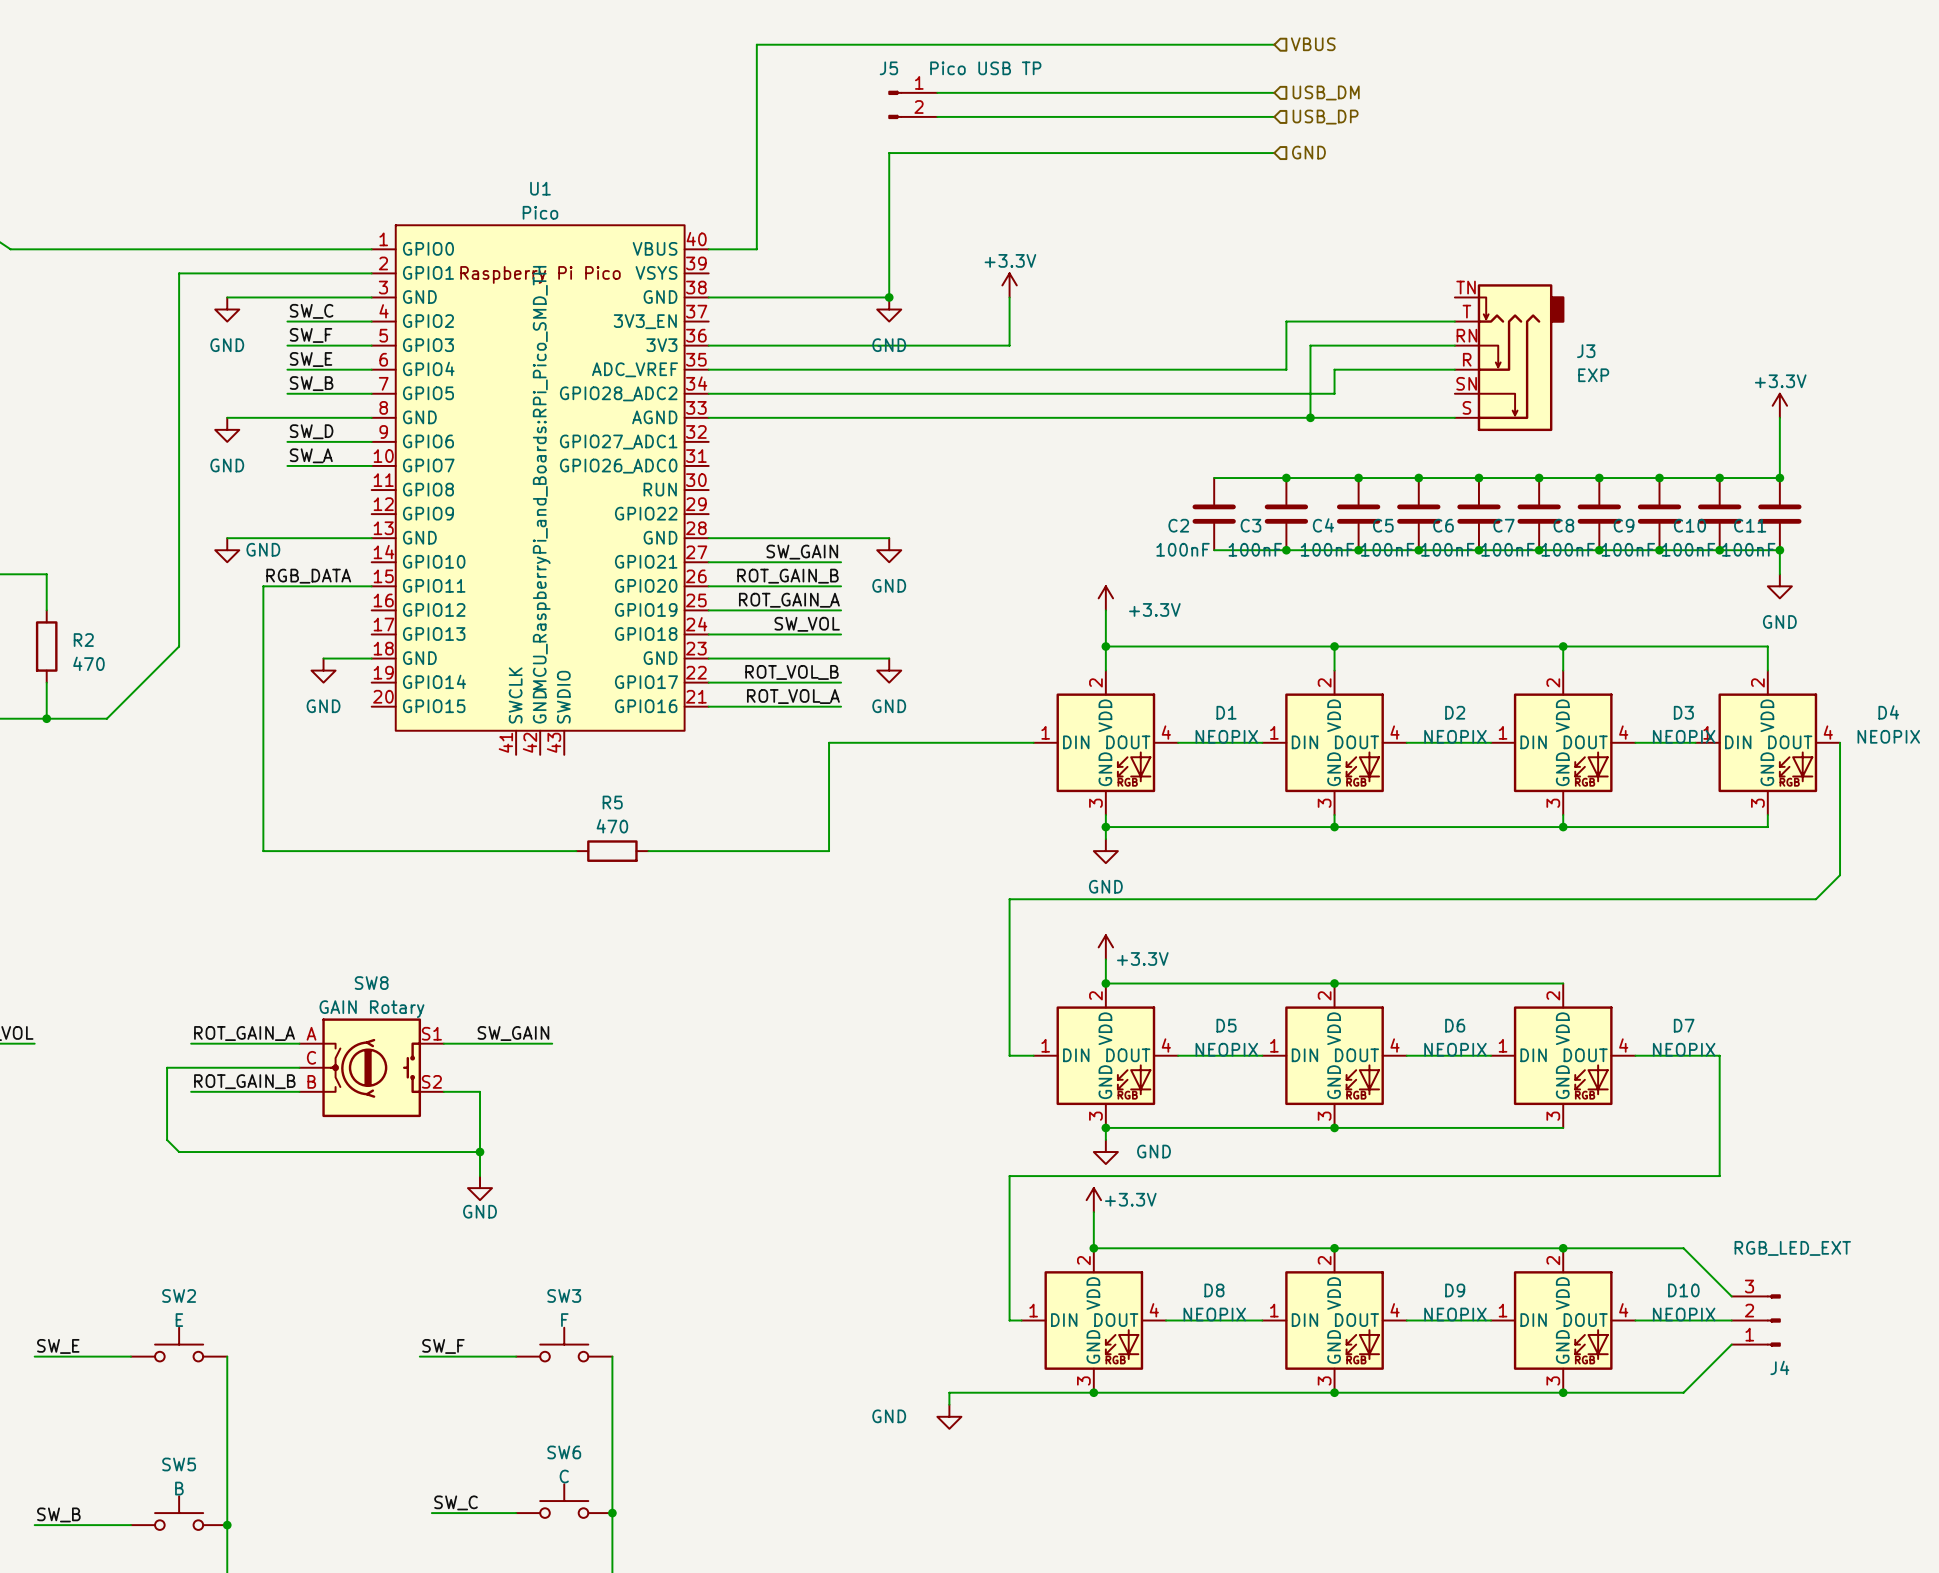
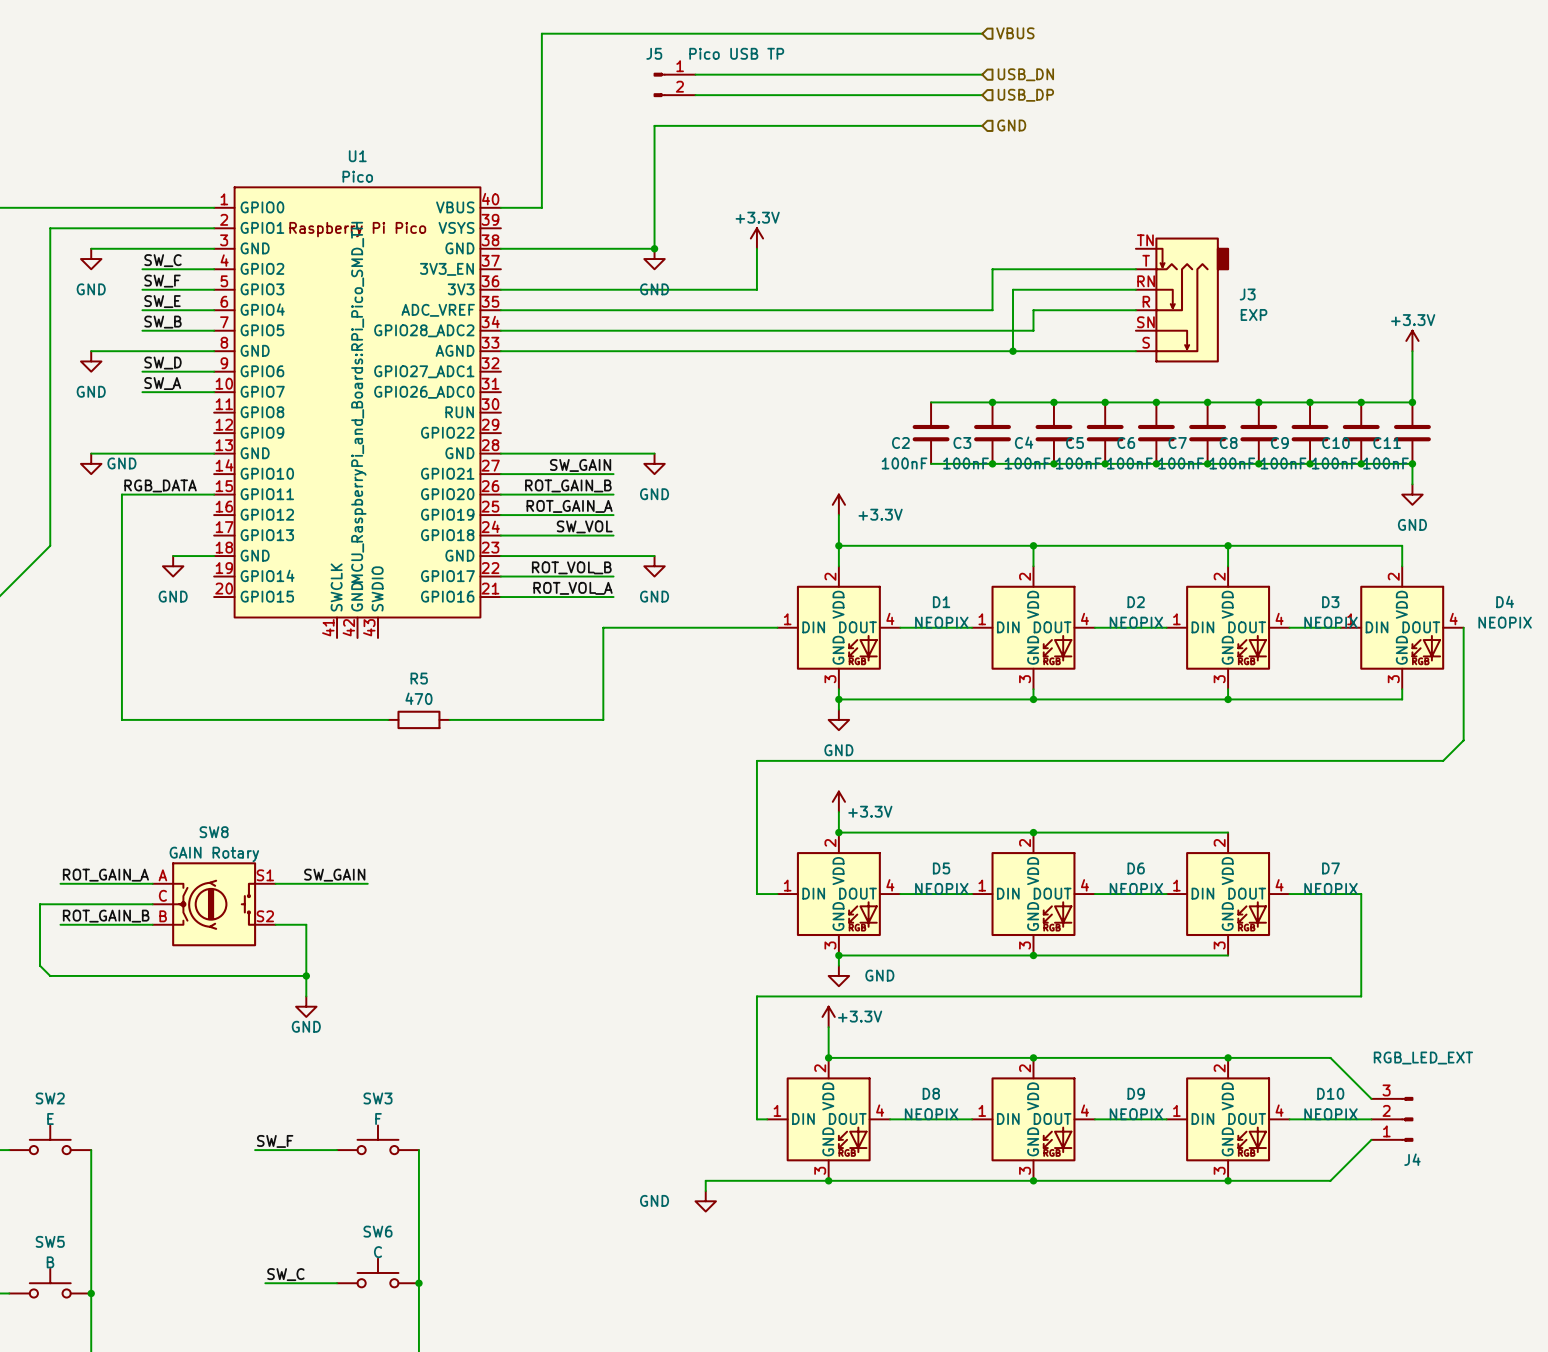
hierarchical label: USB_DM (1326, 92) -> USB_DN (1025, 74)

